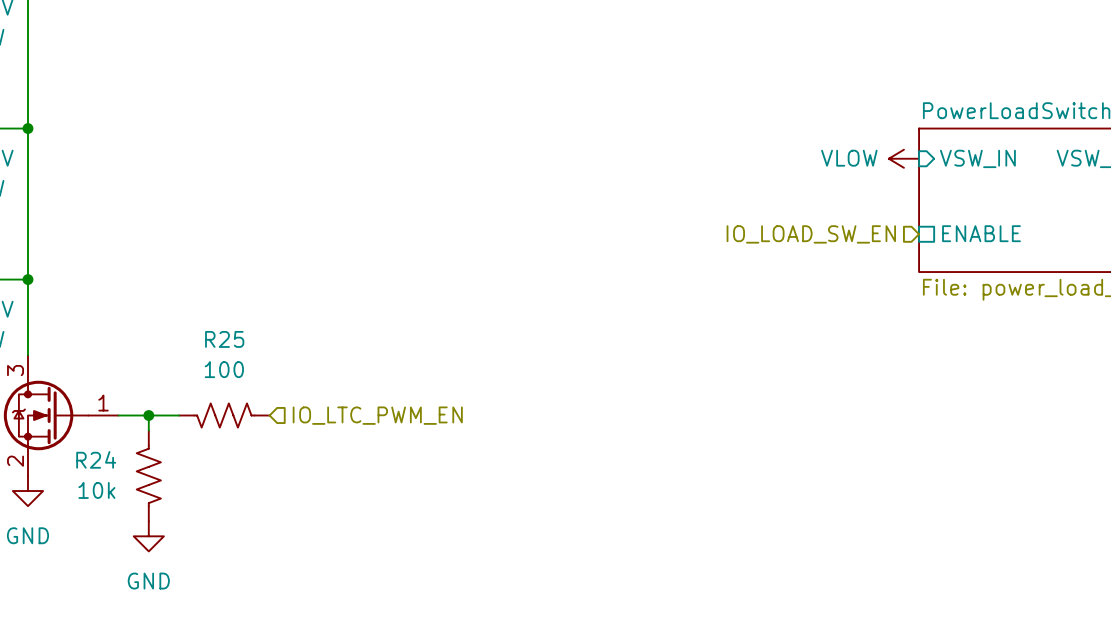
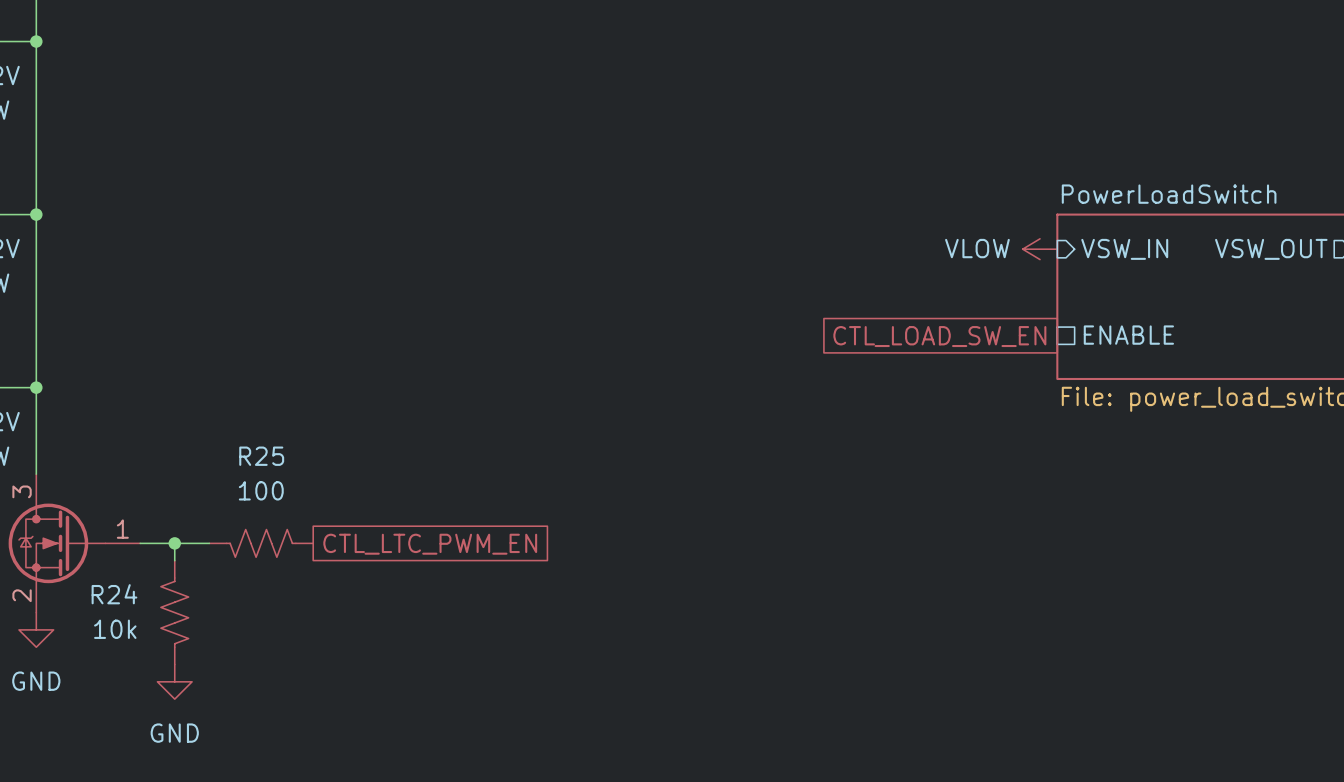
hierarchical label: IO_LOAD_SW_EN (811, 234) -> none
global label: none -> CTL_LOAD_SW_EN (939, 336)
hierarchical label: IO_LTC_PWM_EN (377, 415) -> none
global label: none -> CTL_LTC_PWM_EN (430, 544)

